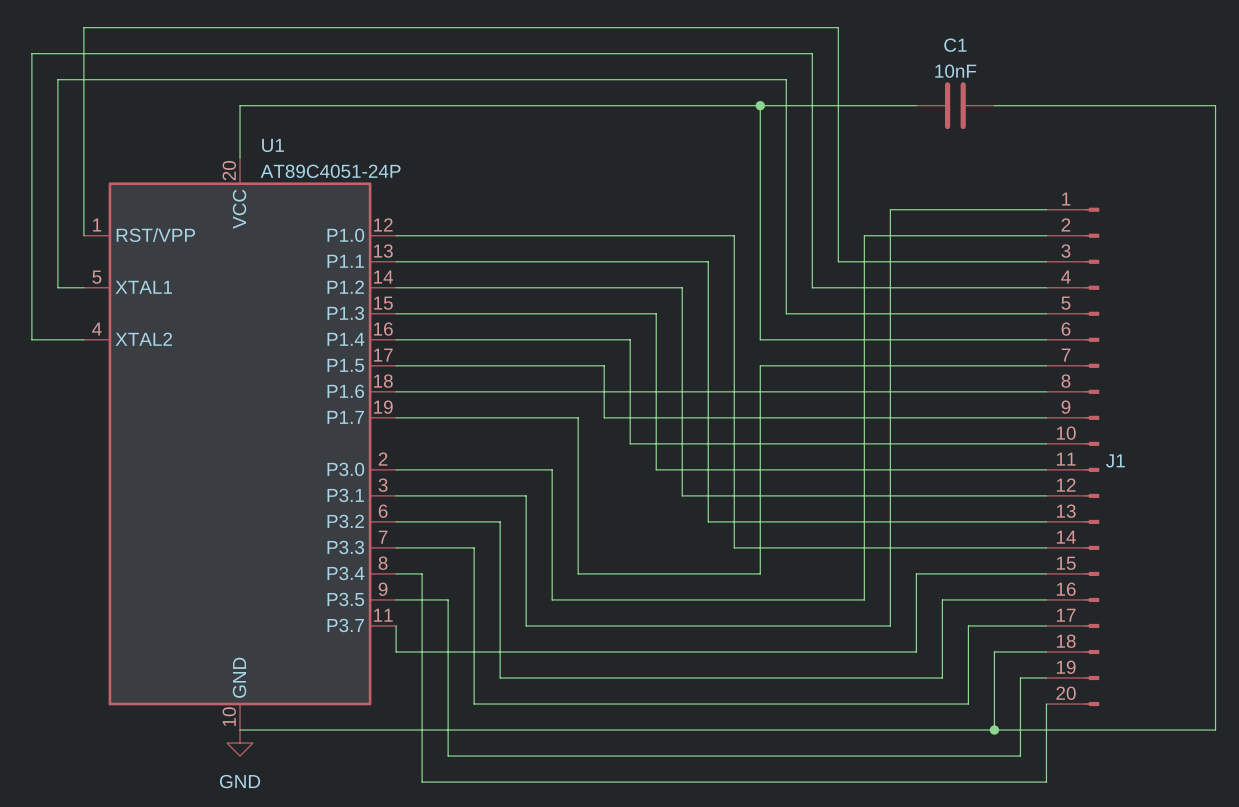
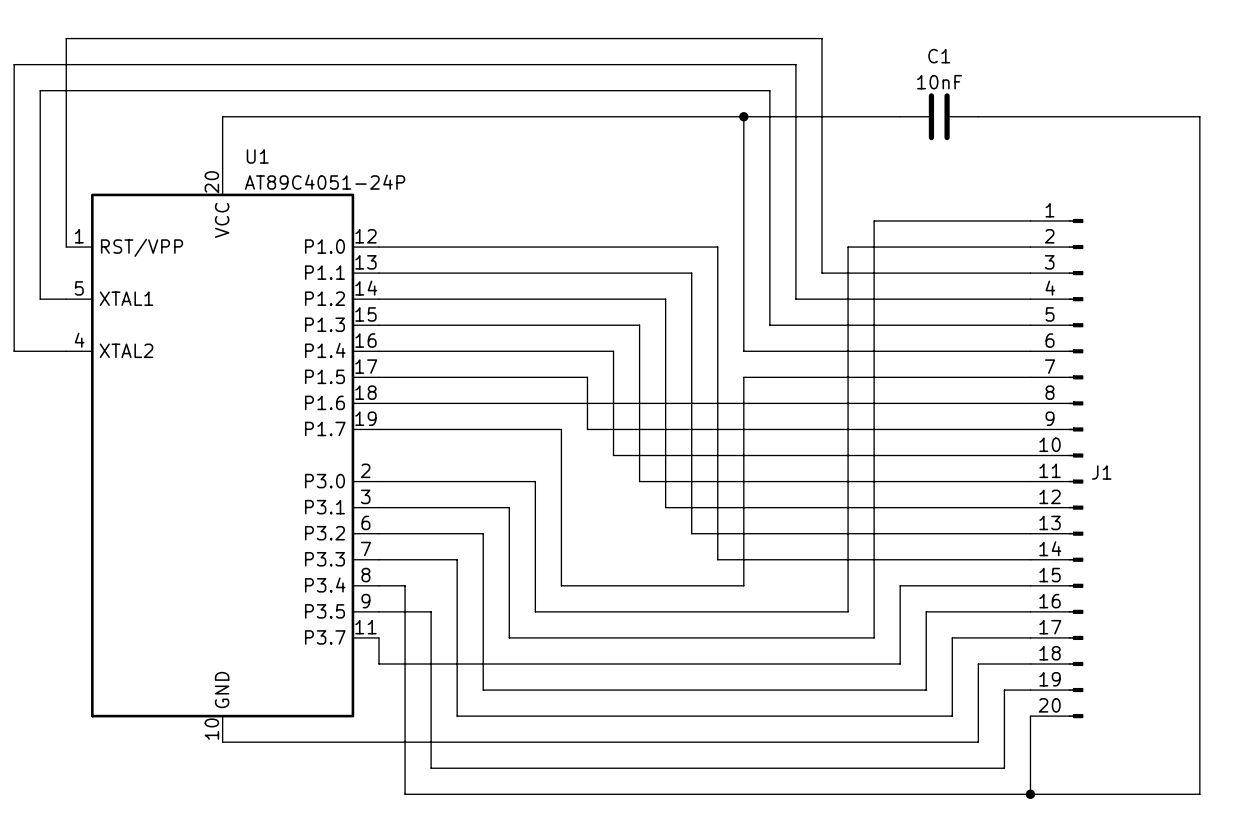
wire: (994, 730) (1215, 730) -> (1030, 794) (1199, 794) (1199, 742)
junction: (994, 730) -> none
power symbol: GND (240, 743) -> none
junction: none -> (1030, 794)

